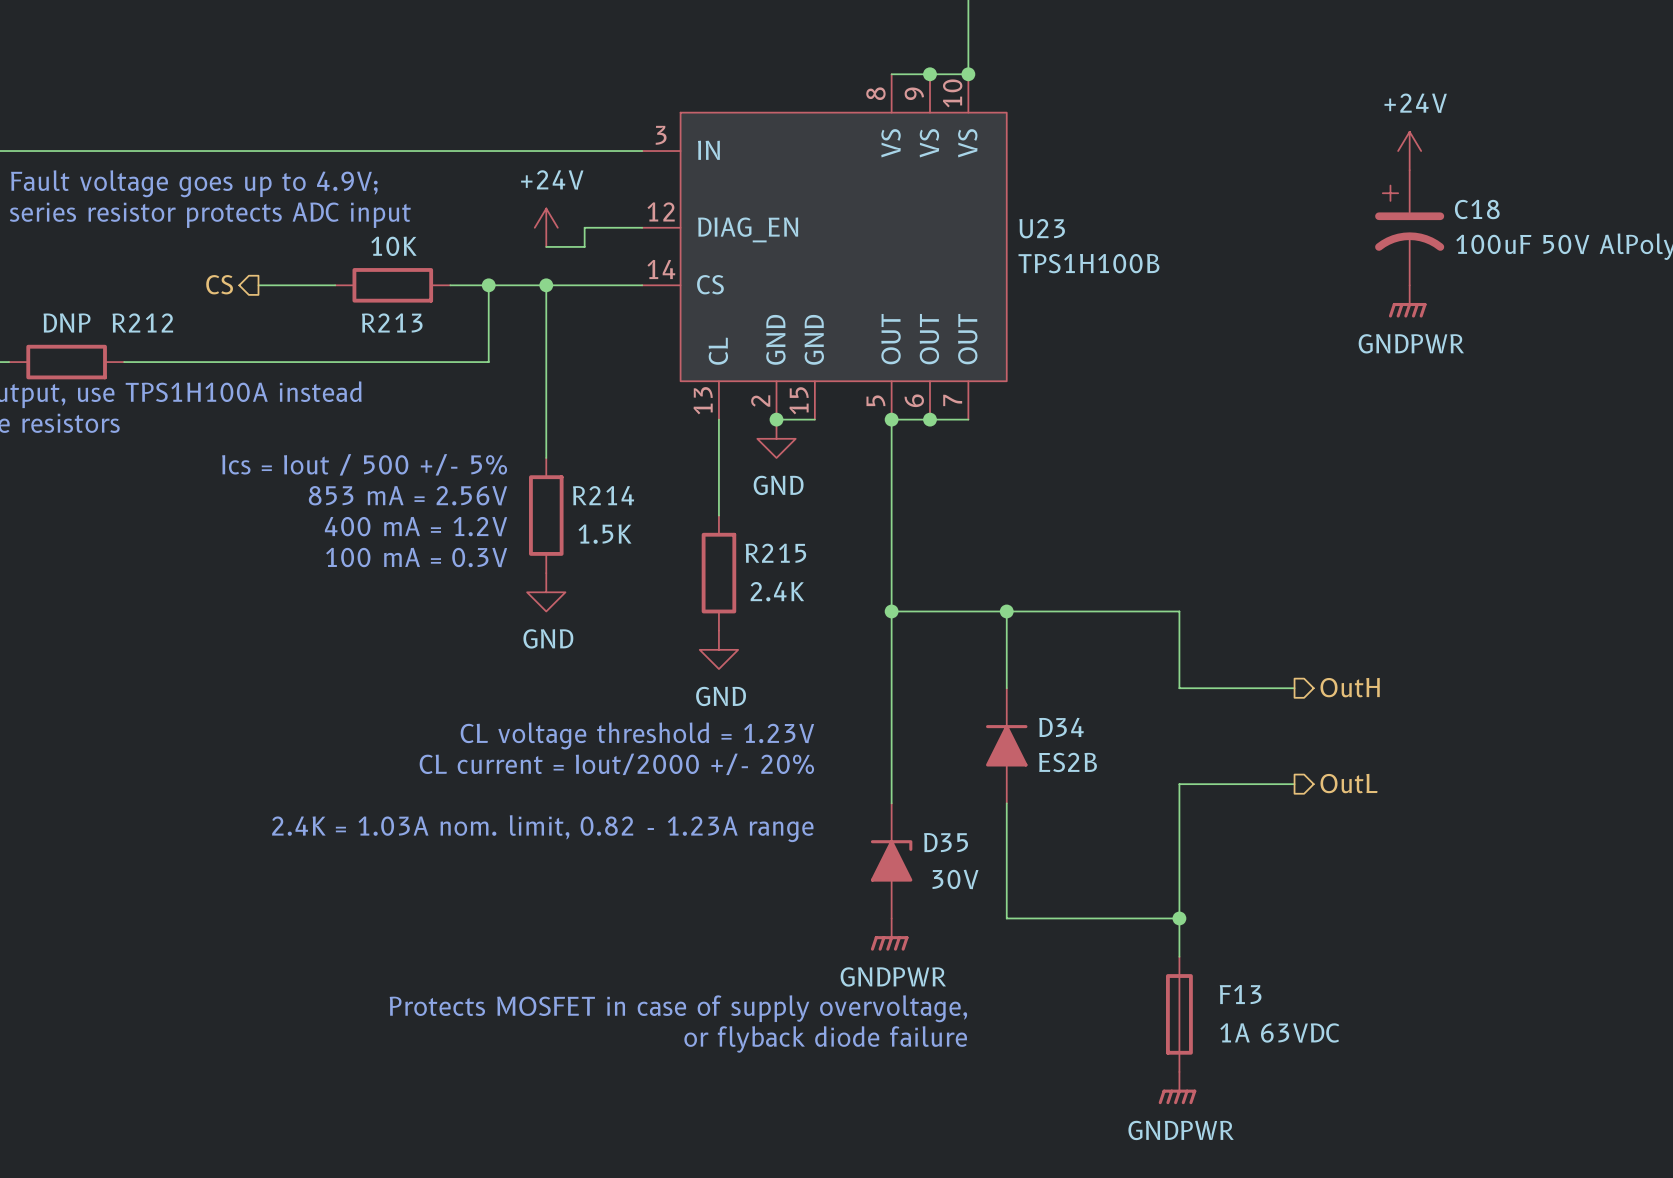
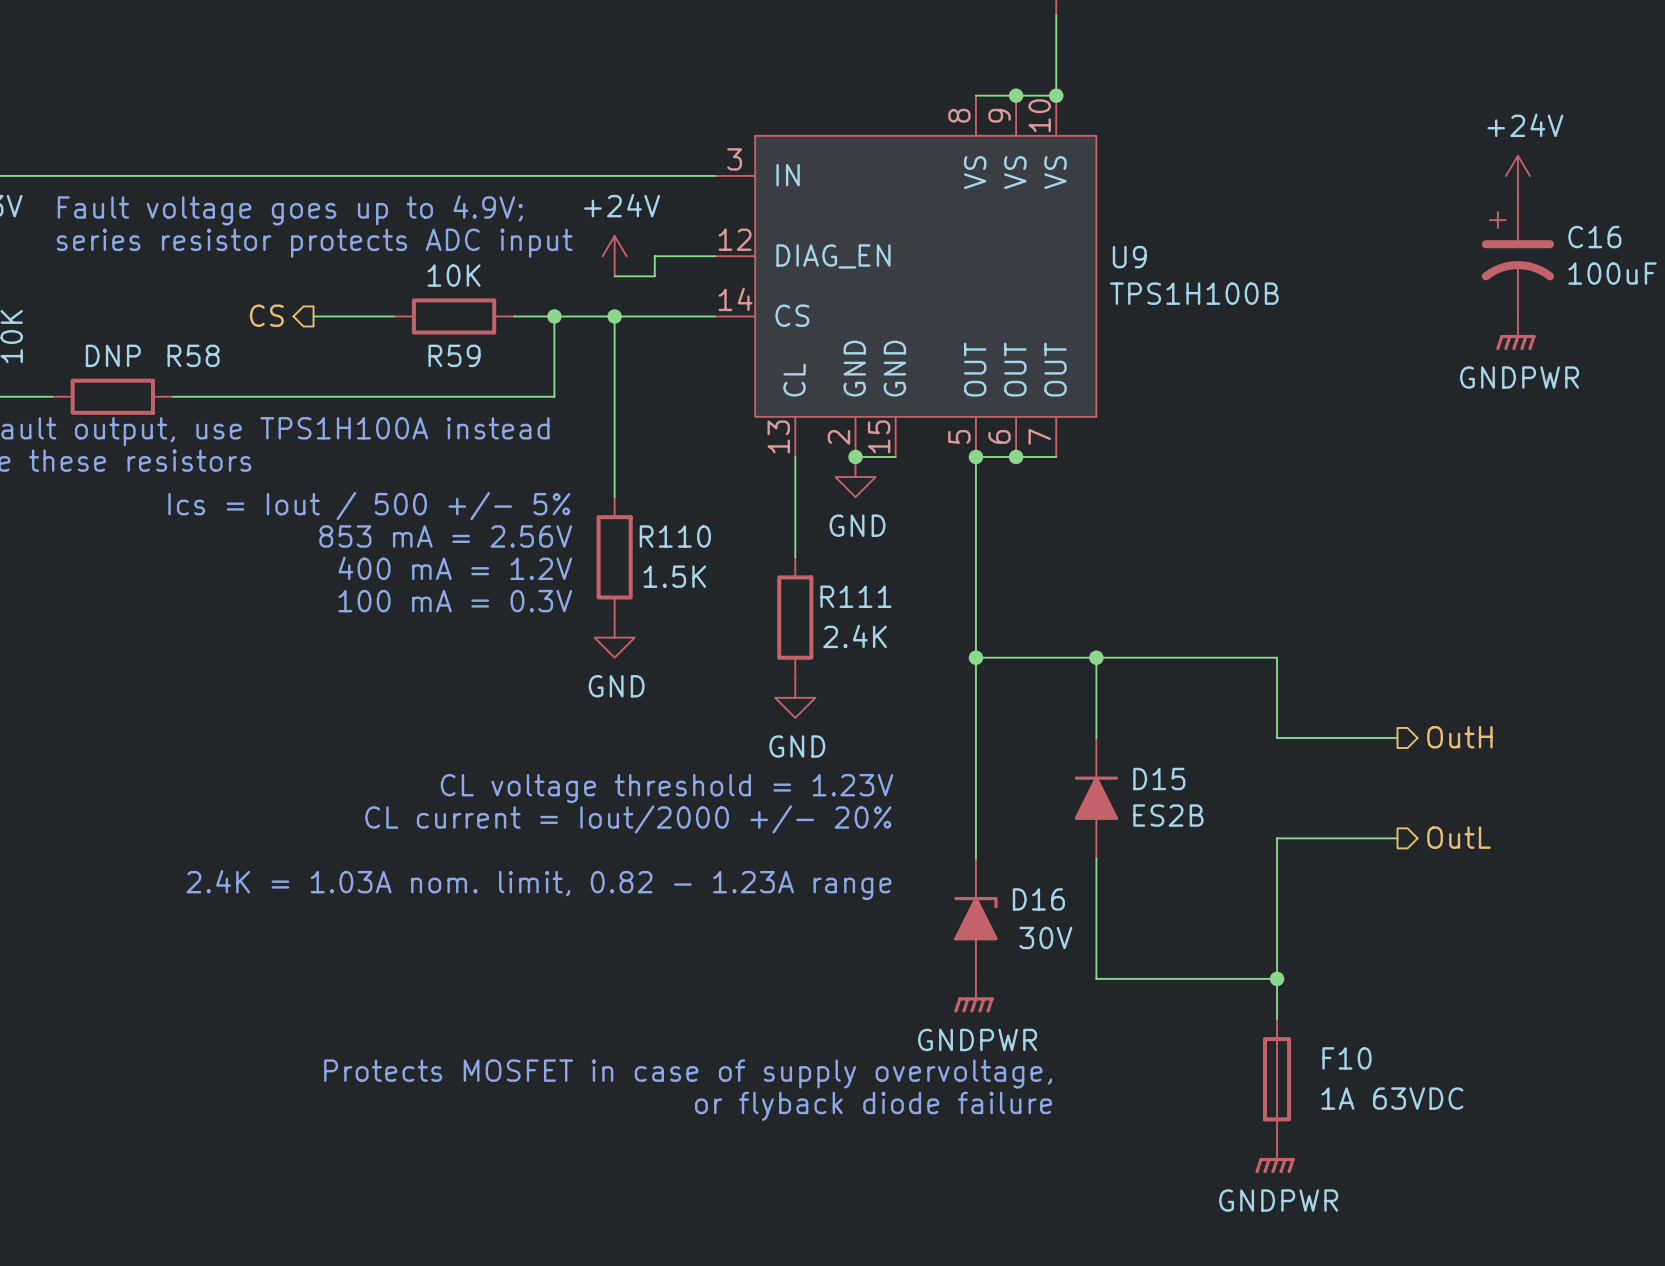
C18 name: C18 (1477, 209) -> C16 (1594, 237)
U23 name: U23 (1042, 228) -> U9 (1129, 257)
R212 name: R212 (142, 322) -> R58 (193, 355)
R213 name: R213 (392, 322) -> R59 (454, 355)
R214 name: R214 (603, 495) -> R110 (675, 536)
R215 name: R215 (775, 553) -> R111 (855, 596)
D34 name: D34 (1061, 727) -> D15 (1159, 779)
D35 name: D35 (946, 842) -> D16 (1038, 899)
F13 name: F13 (1240, 994) -> F10 (1346, 1058)

